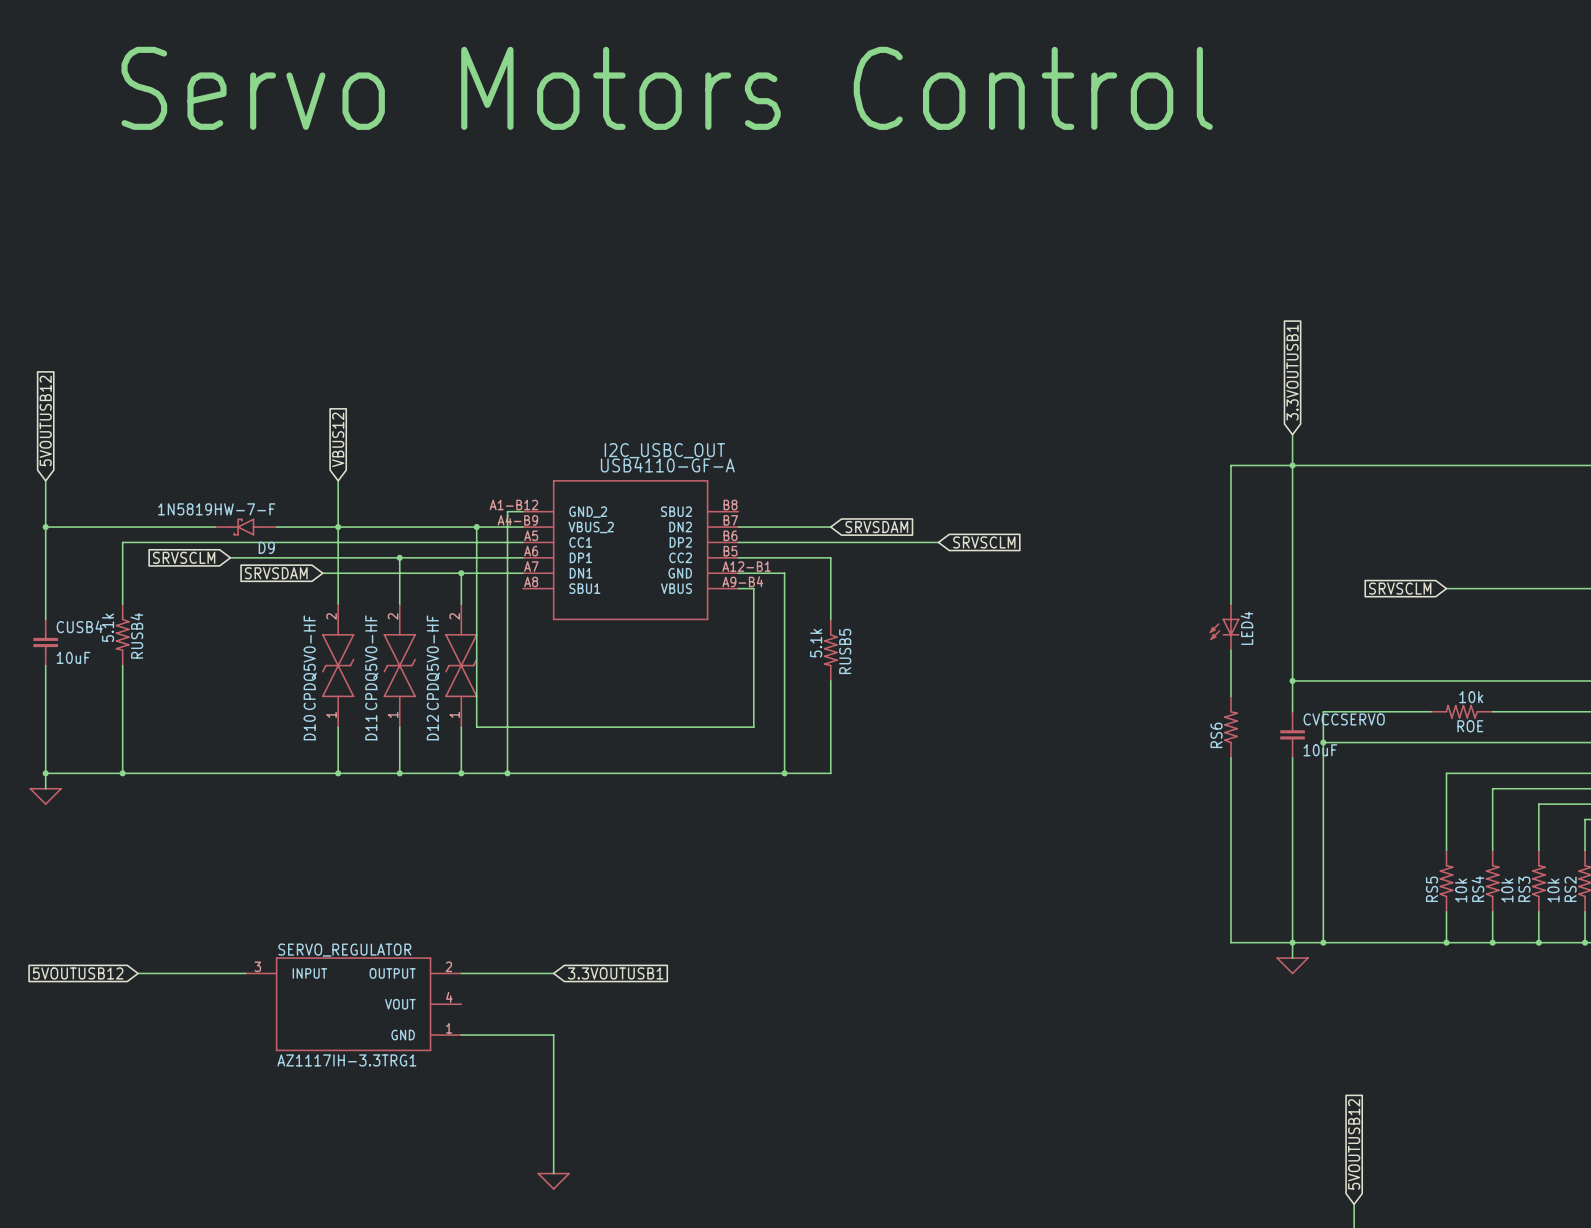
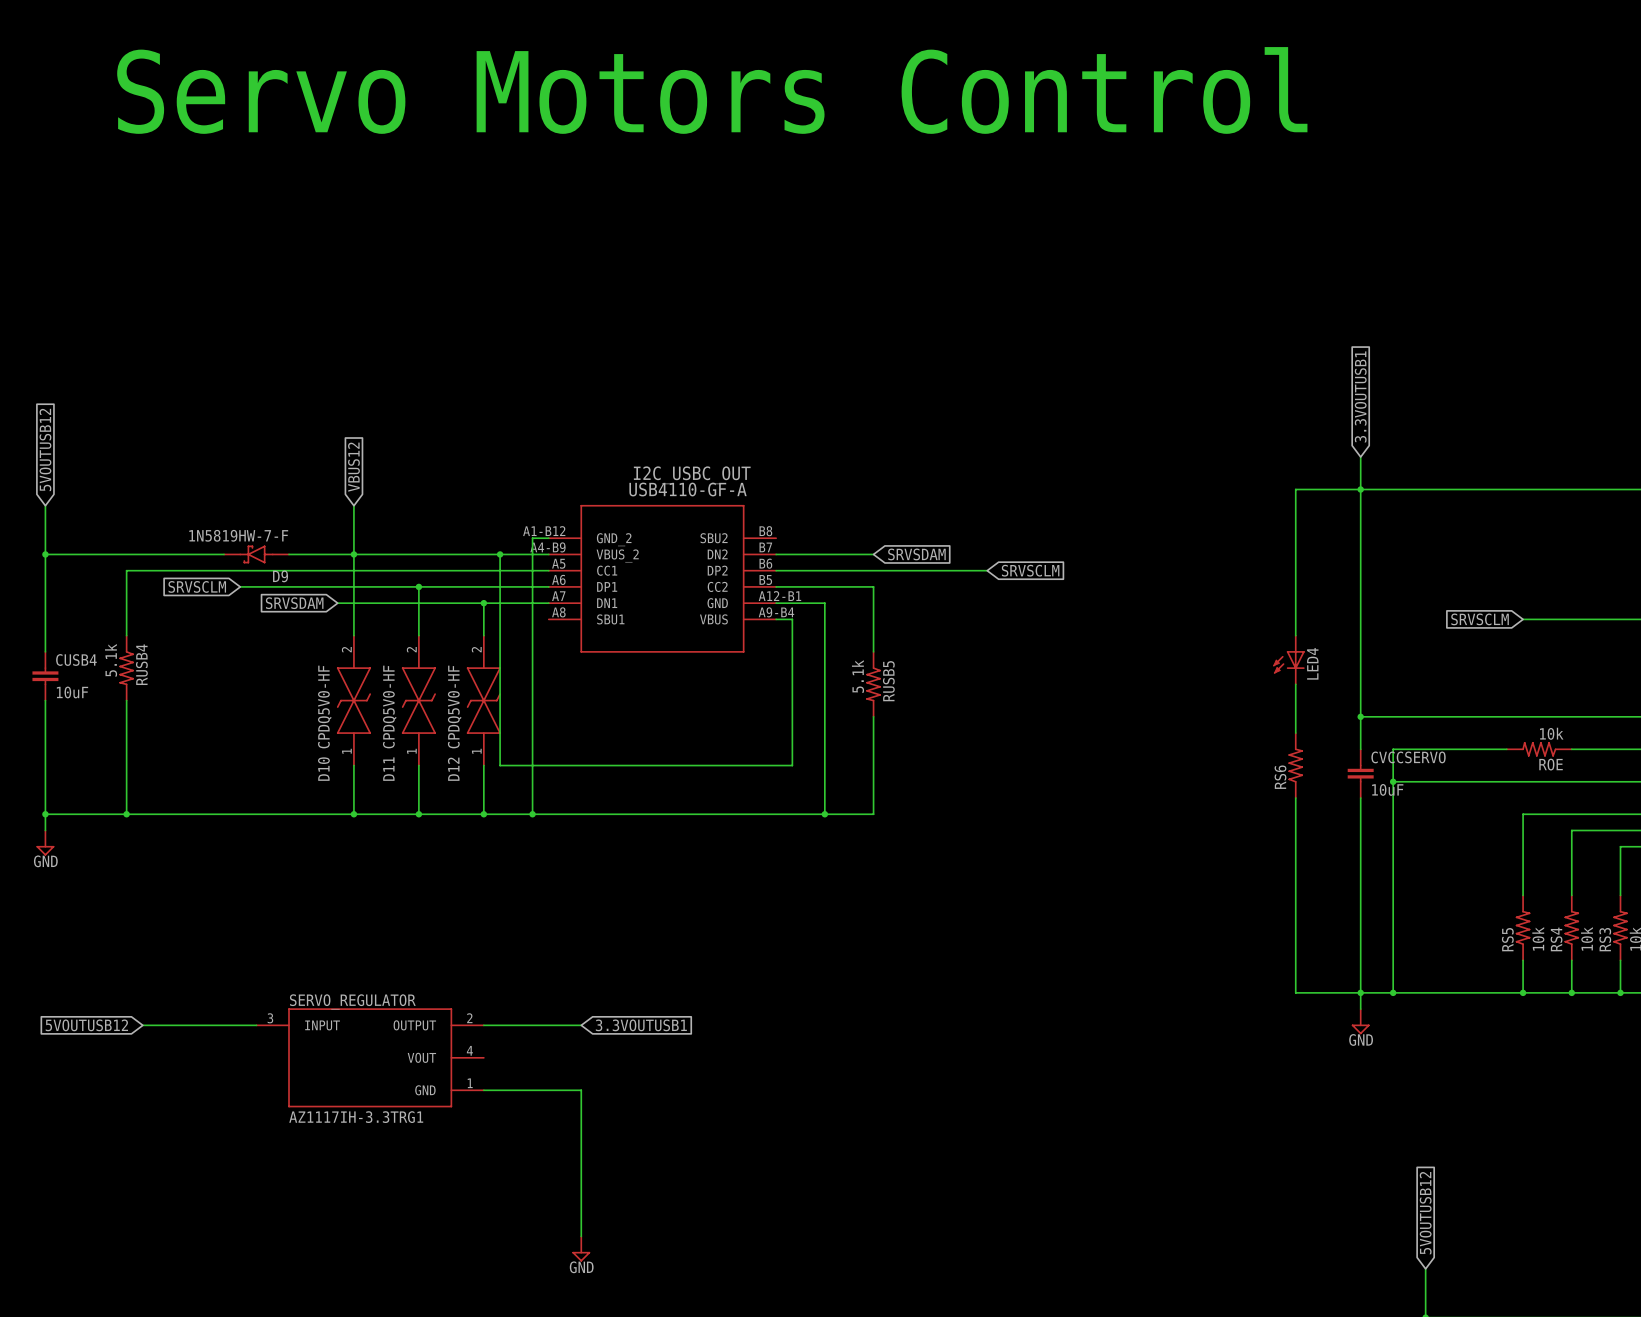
power symbol shape: [29, 788, 62, 805] -> [36, 830, 55, 856]
power symbol text: none -> GND (45, 861)
power symbol shape: [1276, 957, 1309, 974] -> [1351, 1009, 1370, 1035]
power symbol text: none -> GND (1361, 1039)
power symbol shape: [537, 1173, 570, 1190] -> [572, 1236, 591, 1262]
power symbol text: none -> GND (581, 1267)

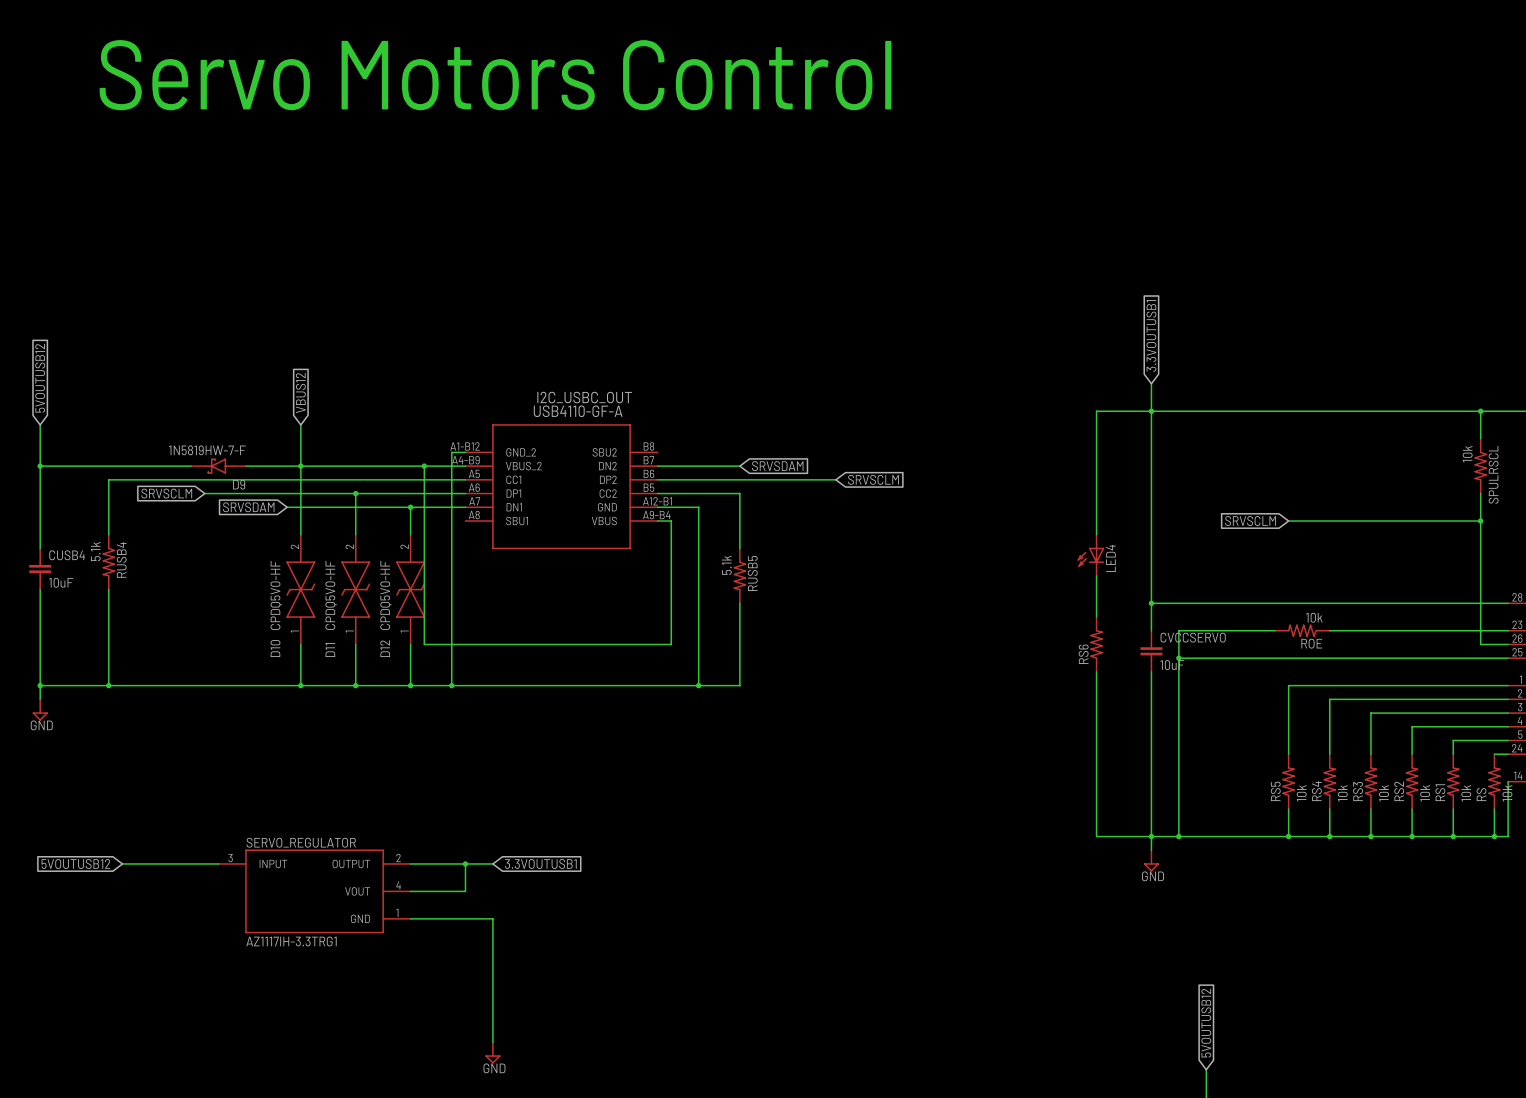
wire: none -> (465, 863) (465, 891) (410, 891)
junction: none -> (465, 863)

